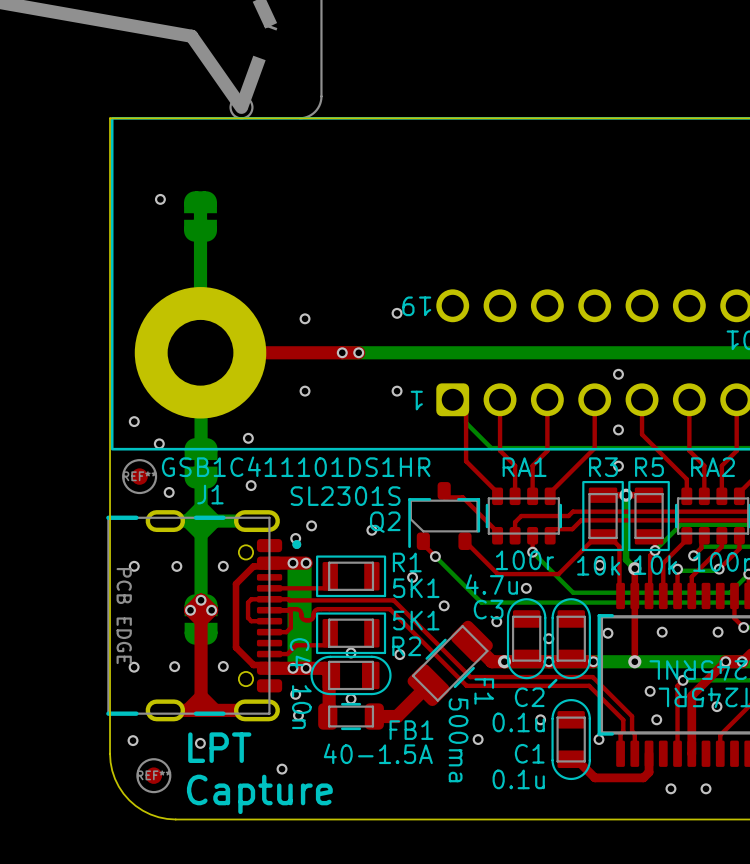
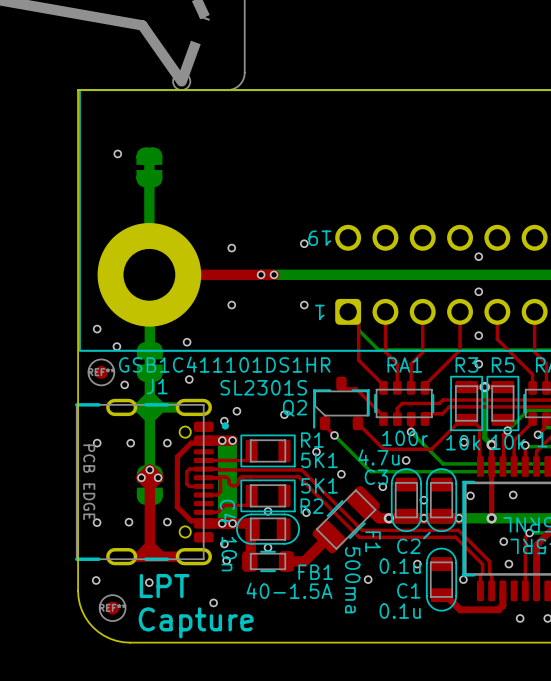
via: none -> (478, 256)

